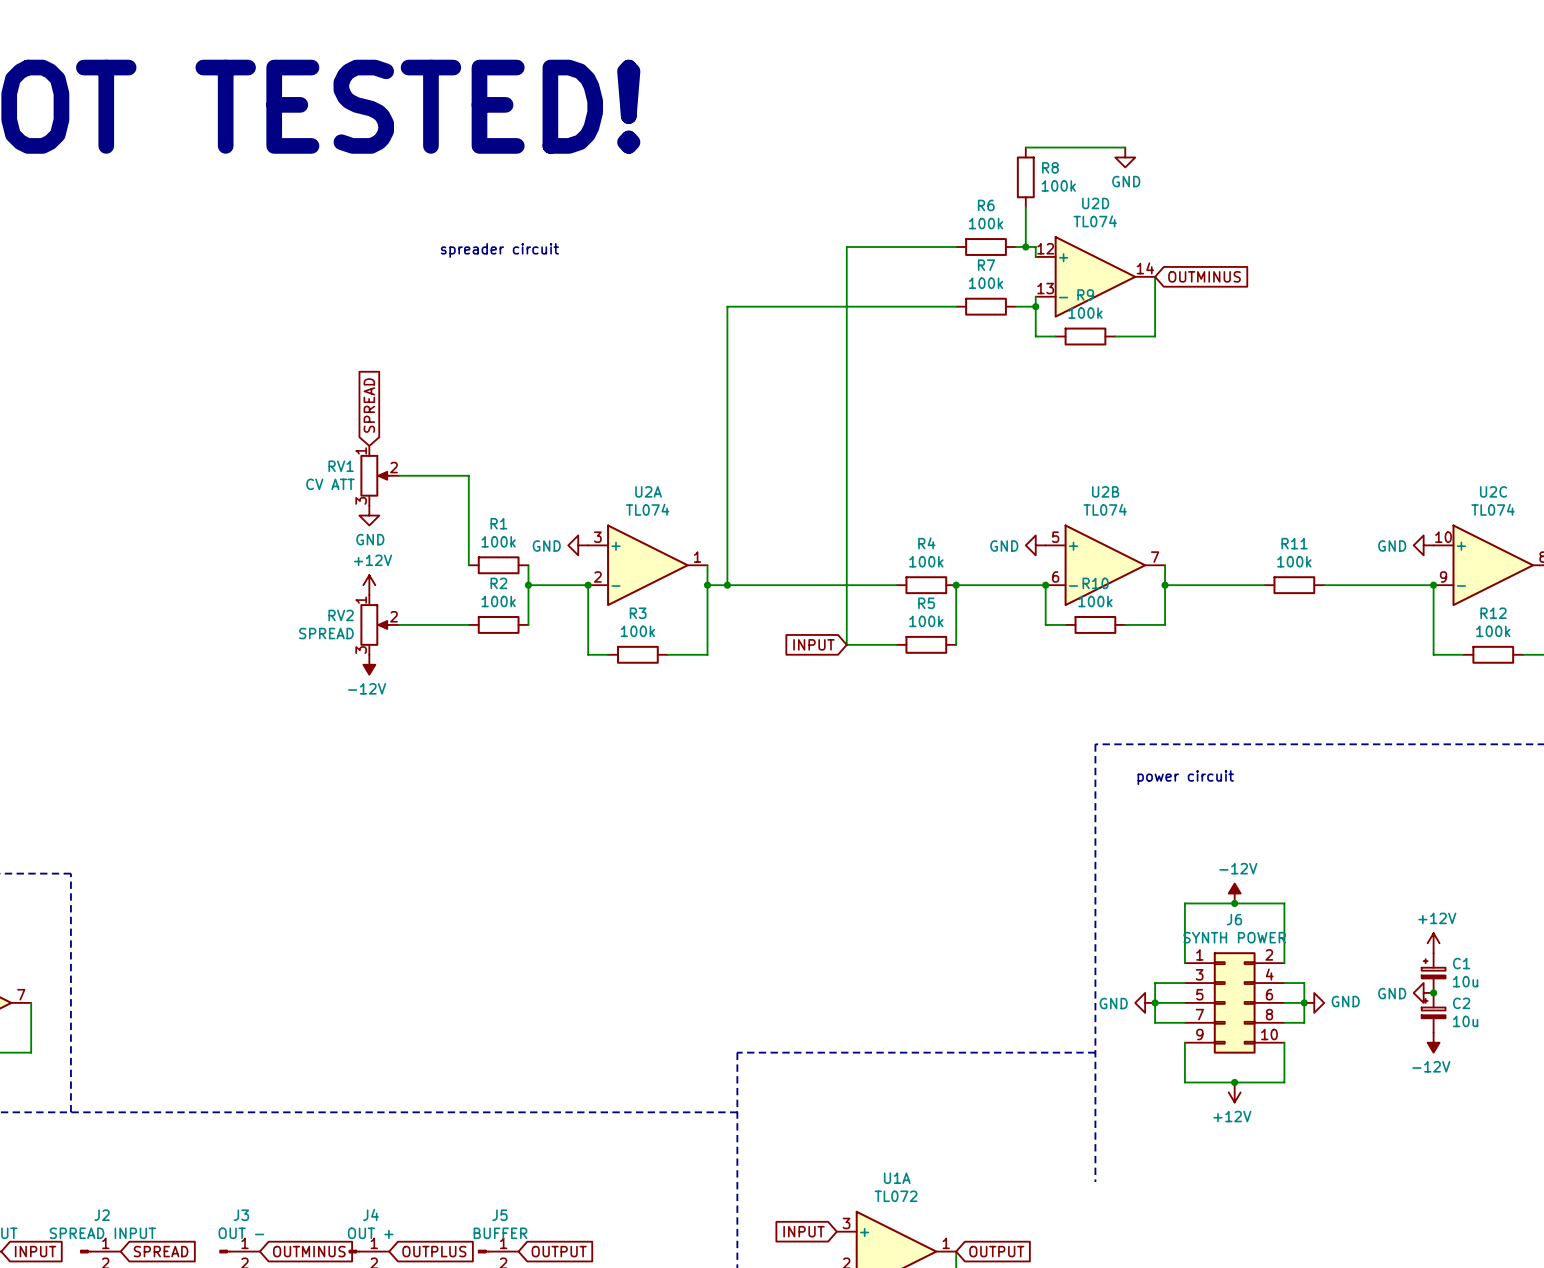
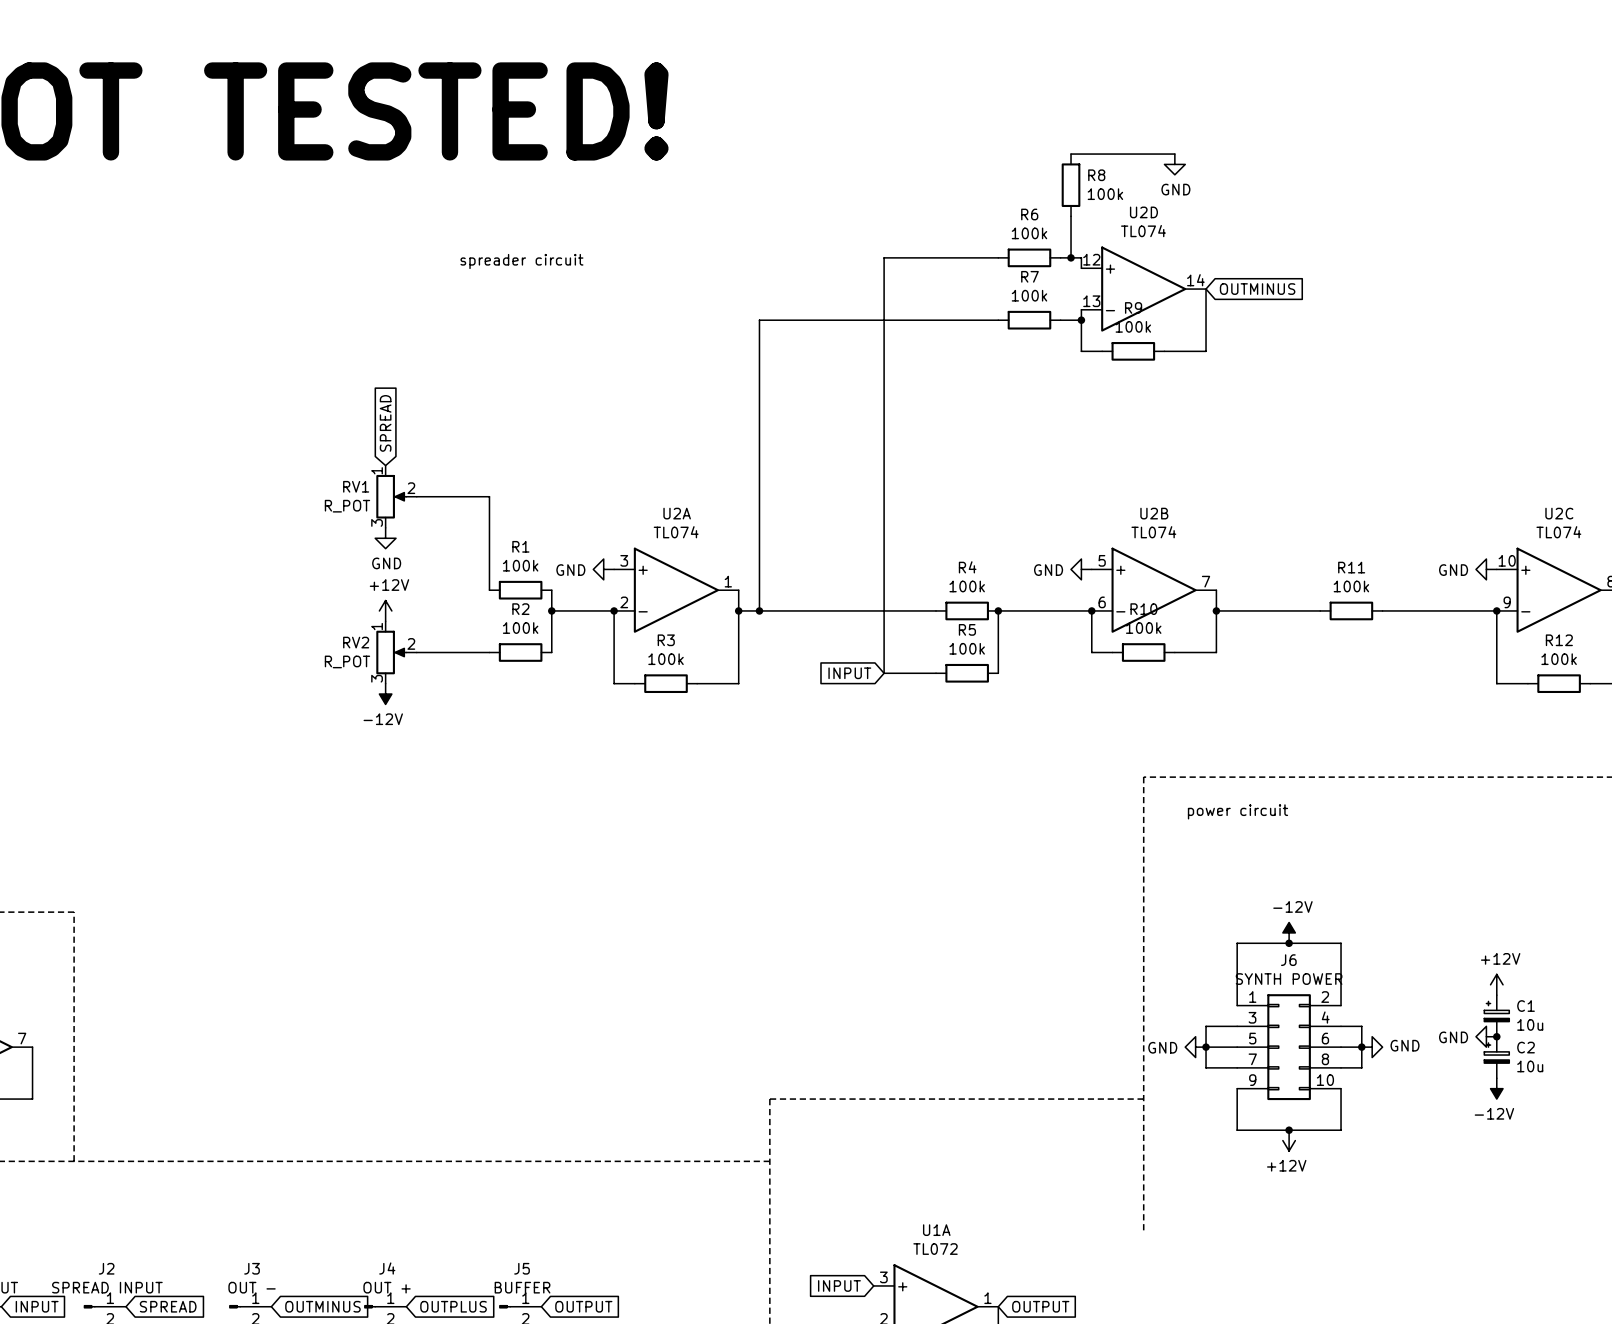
RV1 value: CV ATT (330, 484) -> R_POT (347, 506)
RV2 value: SPREAD (326, 633) -> R_POT (347, 661)

